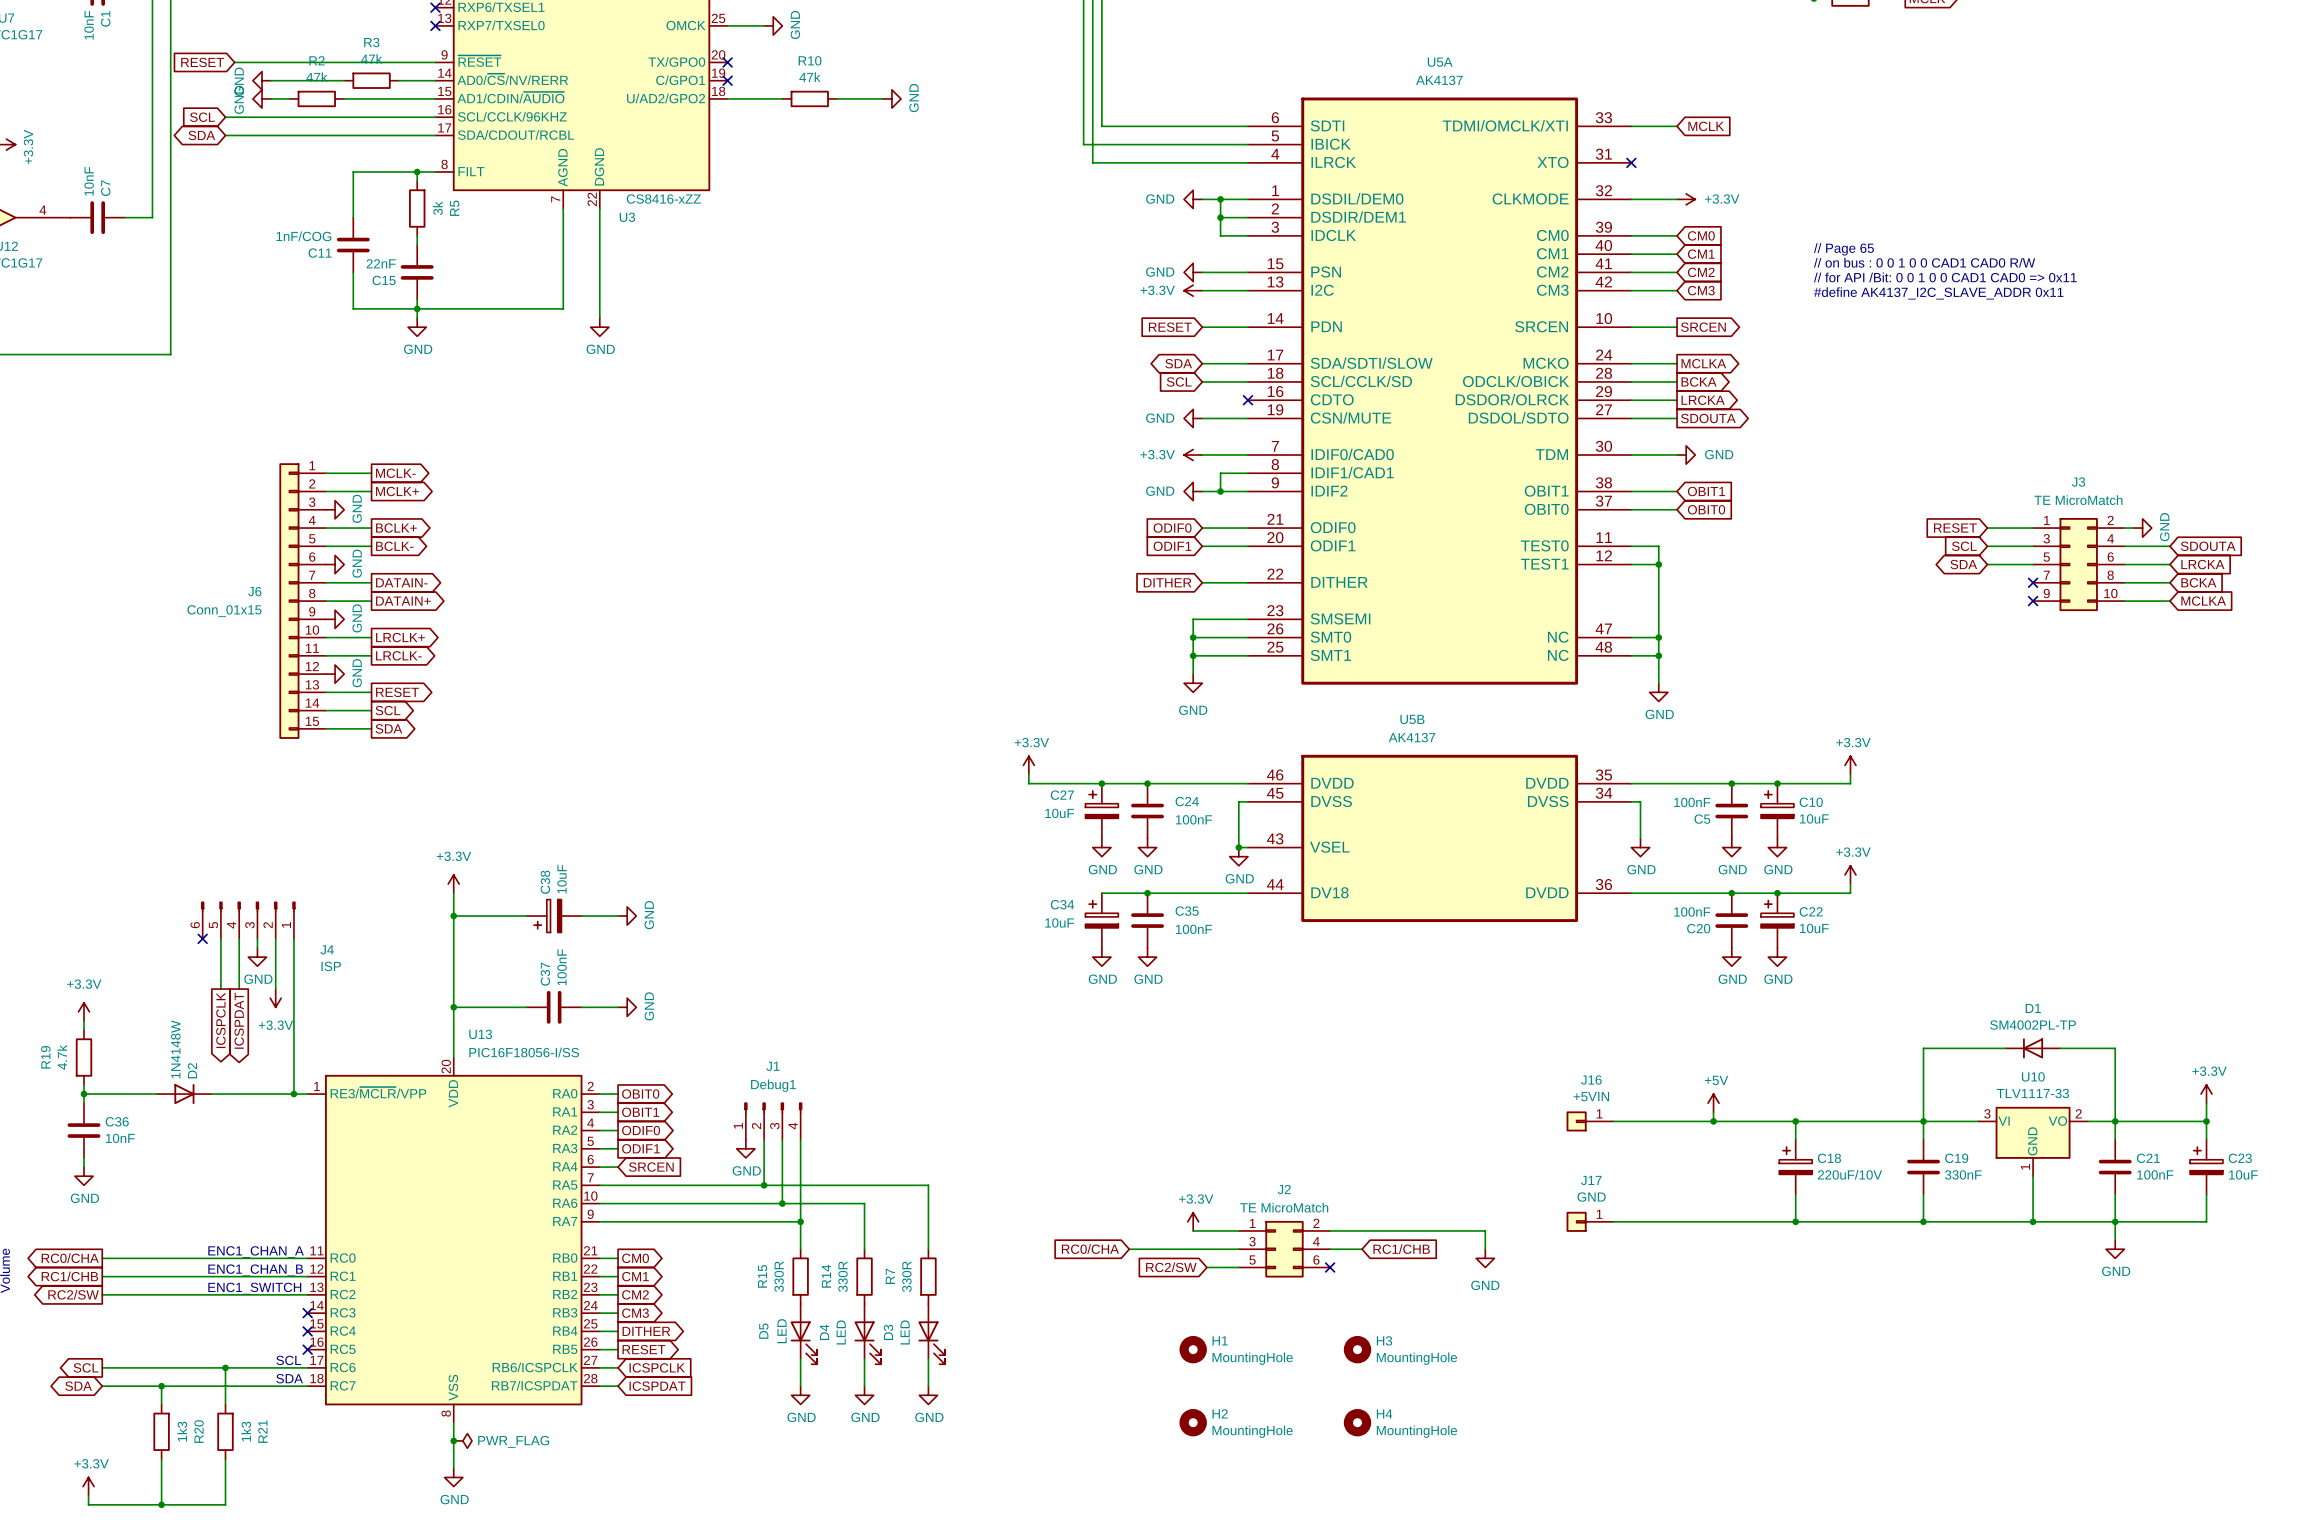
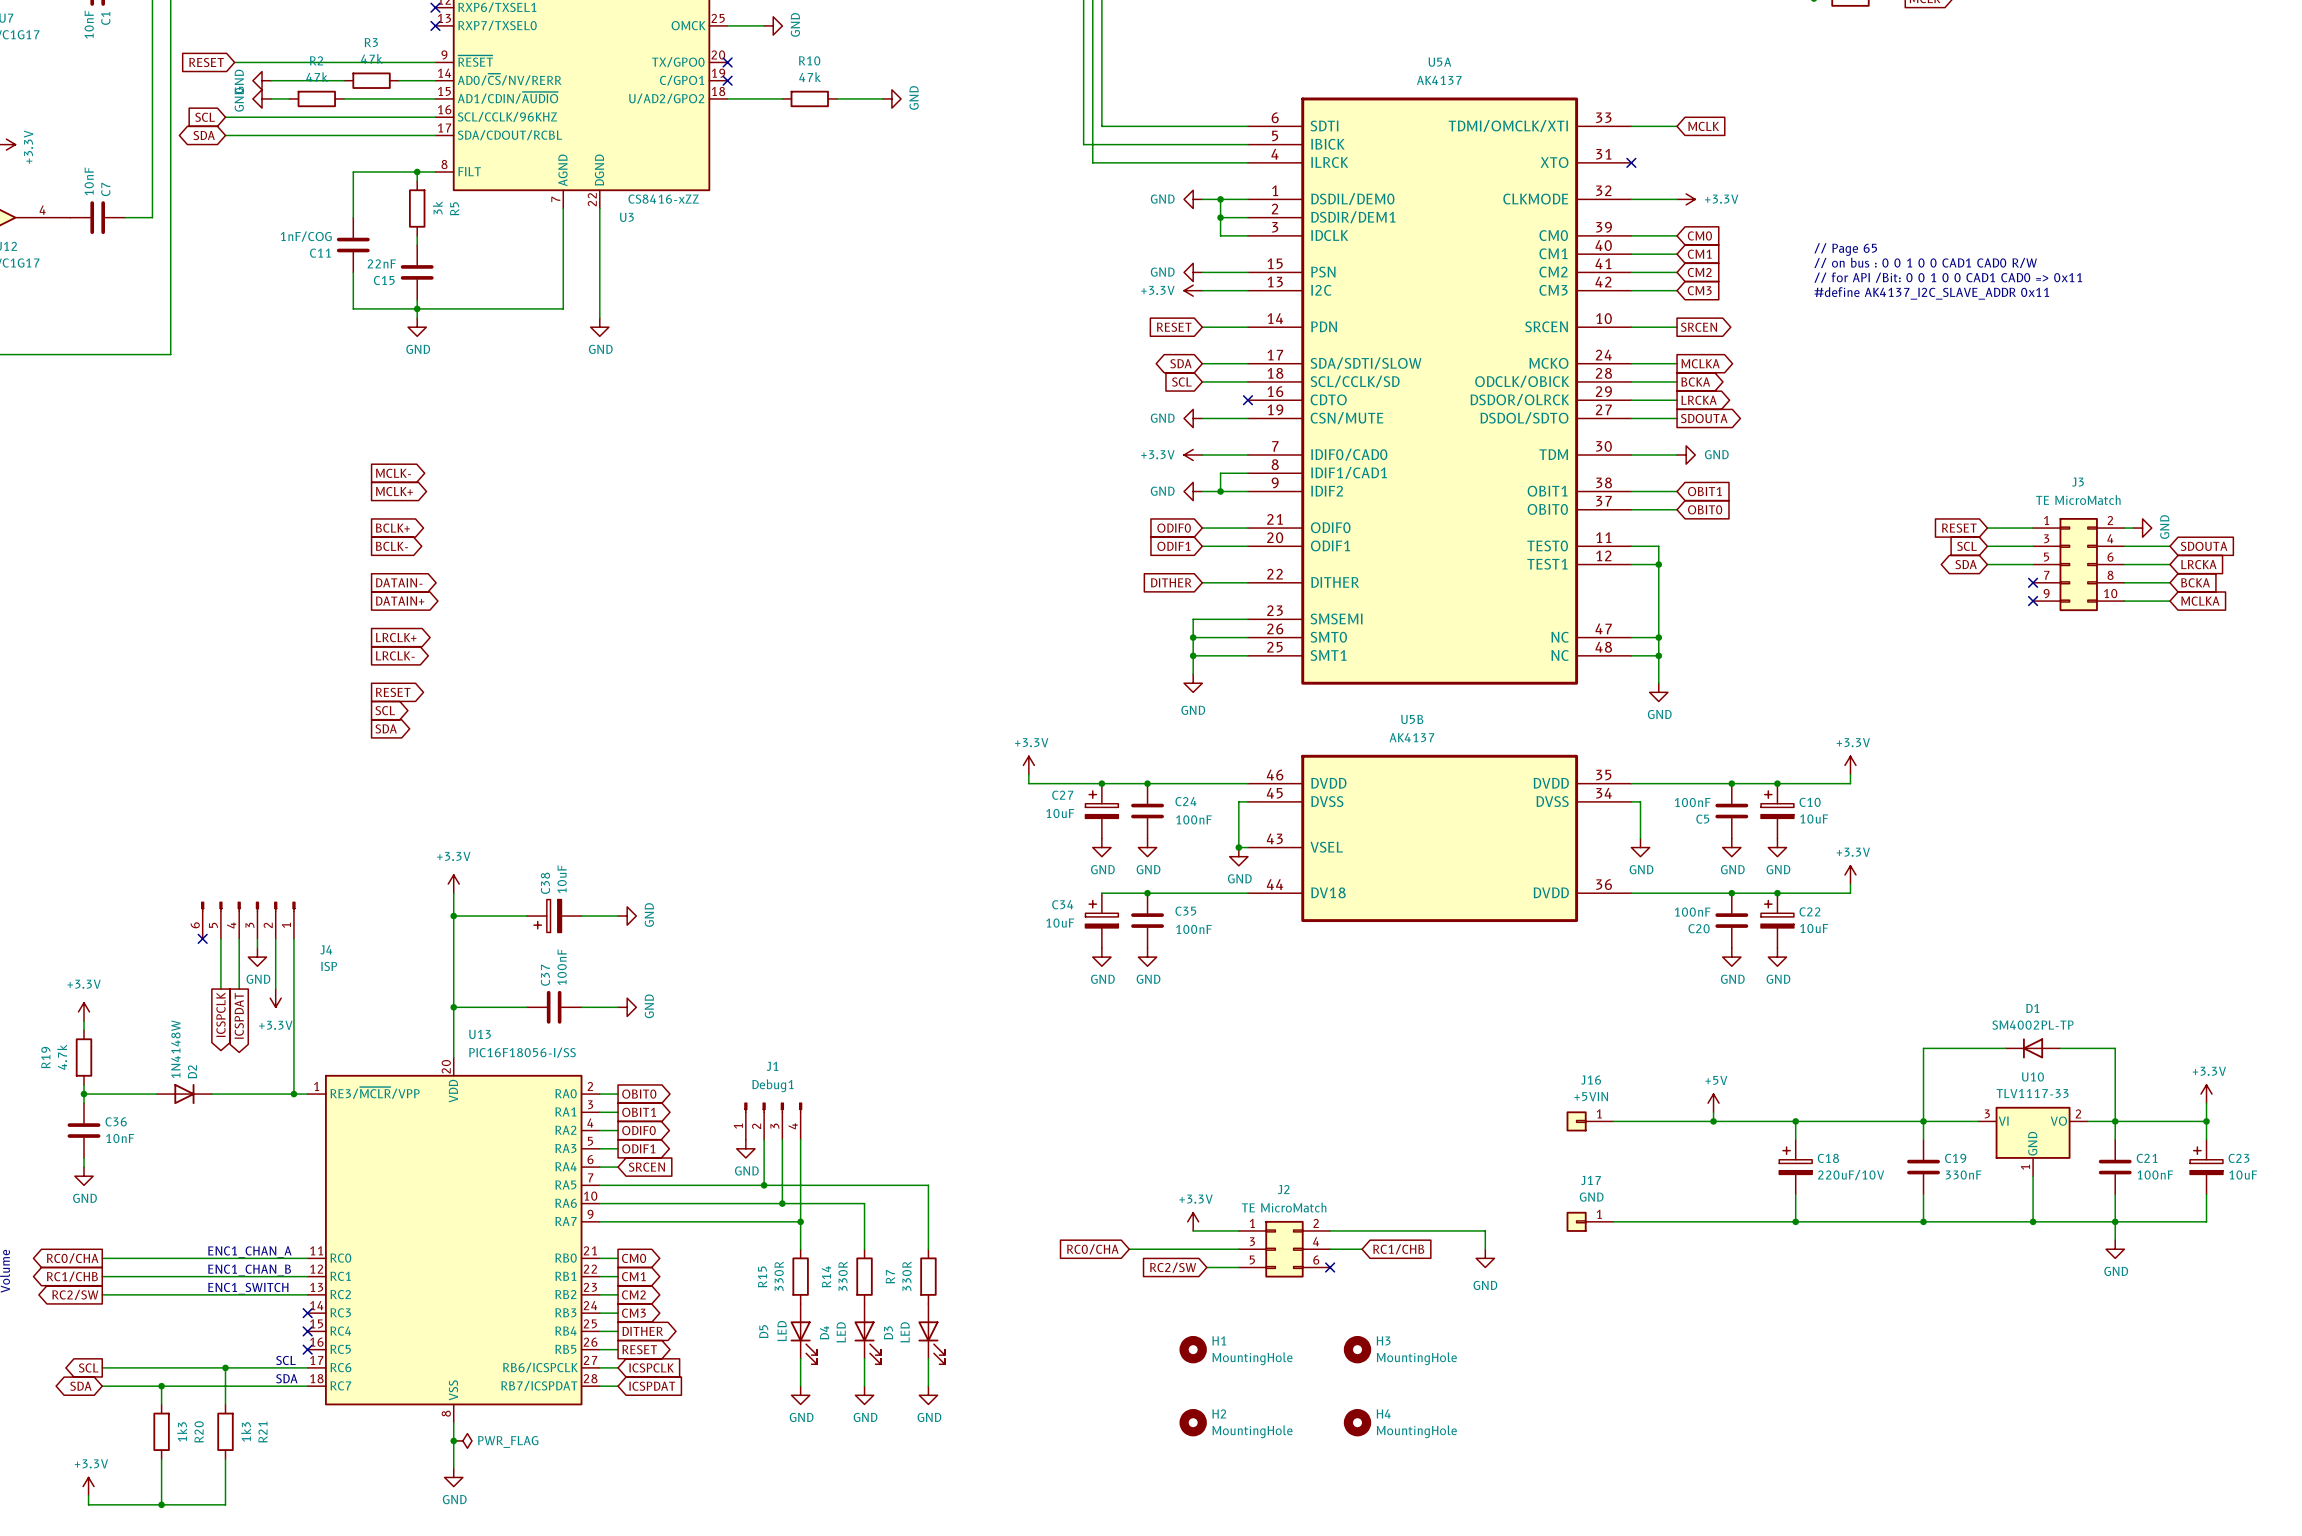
wire: (325, 473) (371, 473) -> none
wire: (325, 491) (371, 491) -> none
power symbol: GND (335, 509) -> none
wire: (325, 528) (371, 528) -> none
wire: (325, 546) (371, 546) -> none
power symbol: GND (335, 564) -> none
wire: (325, 582) (371, 582) -> none
J6: Conn_01x15 (302, 601) -> none
wire: (325, 601) (371, 601) -> none
power symbol: GND (335, 619) -> none
wire: (325, 637) (371, 637) -> none
wire: (325, 655) (371, 655) -> none
power symbol: GND (335, 674) -> none
wire: (325, 692) (371, 692) -> none
wire: (325, 710) (371, 710) -> none
wire: (325, 728) (371, 728) -> none

